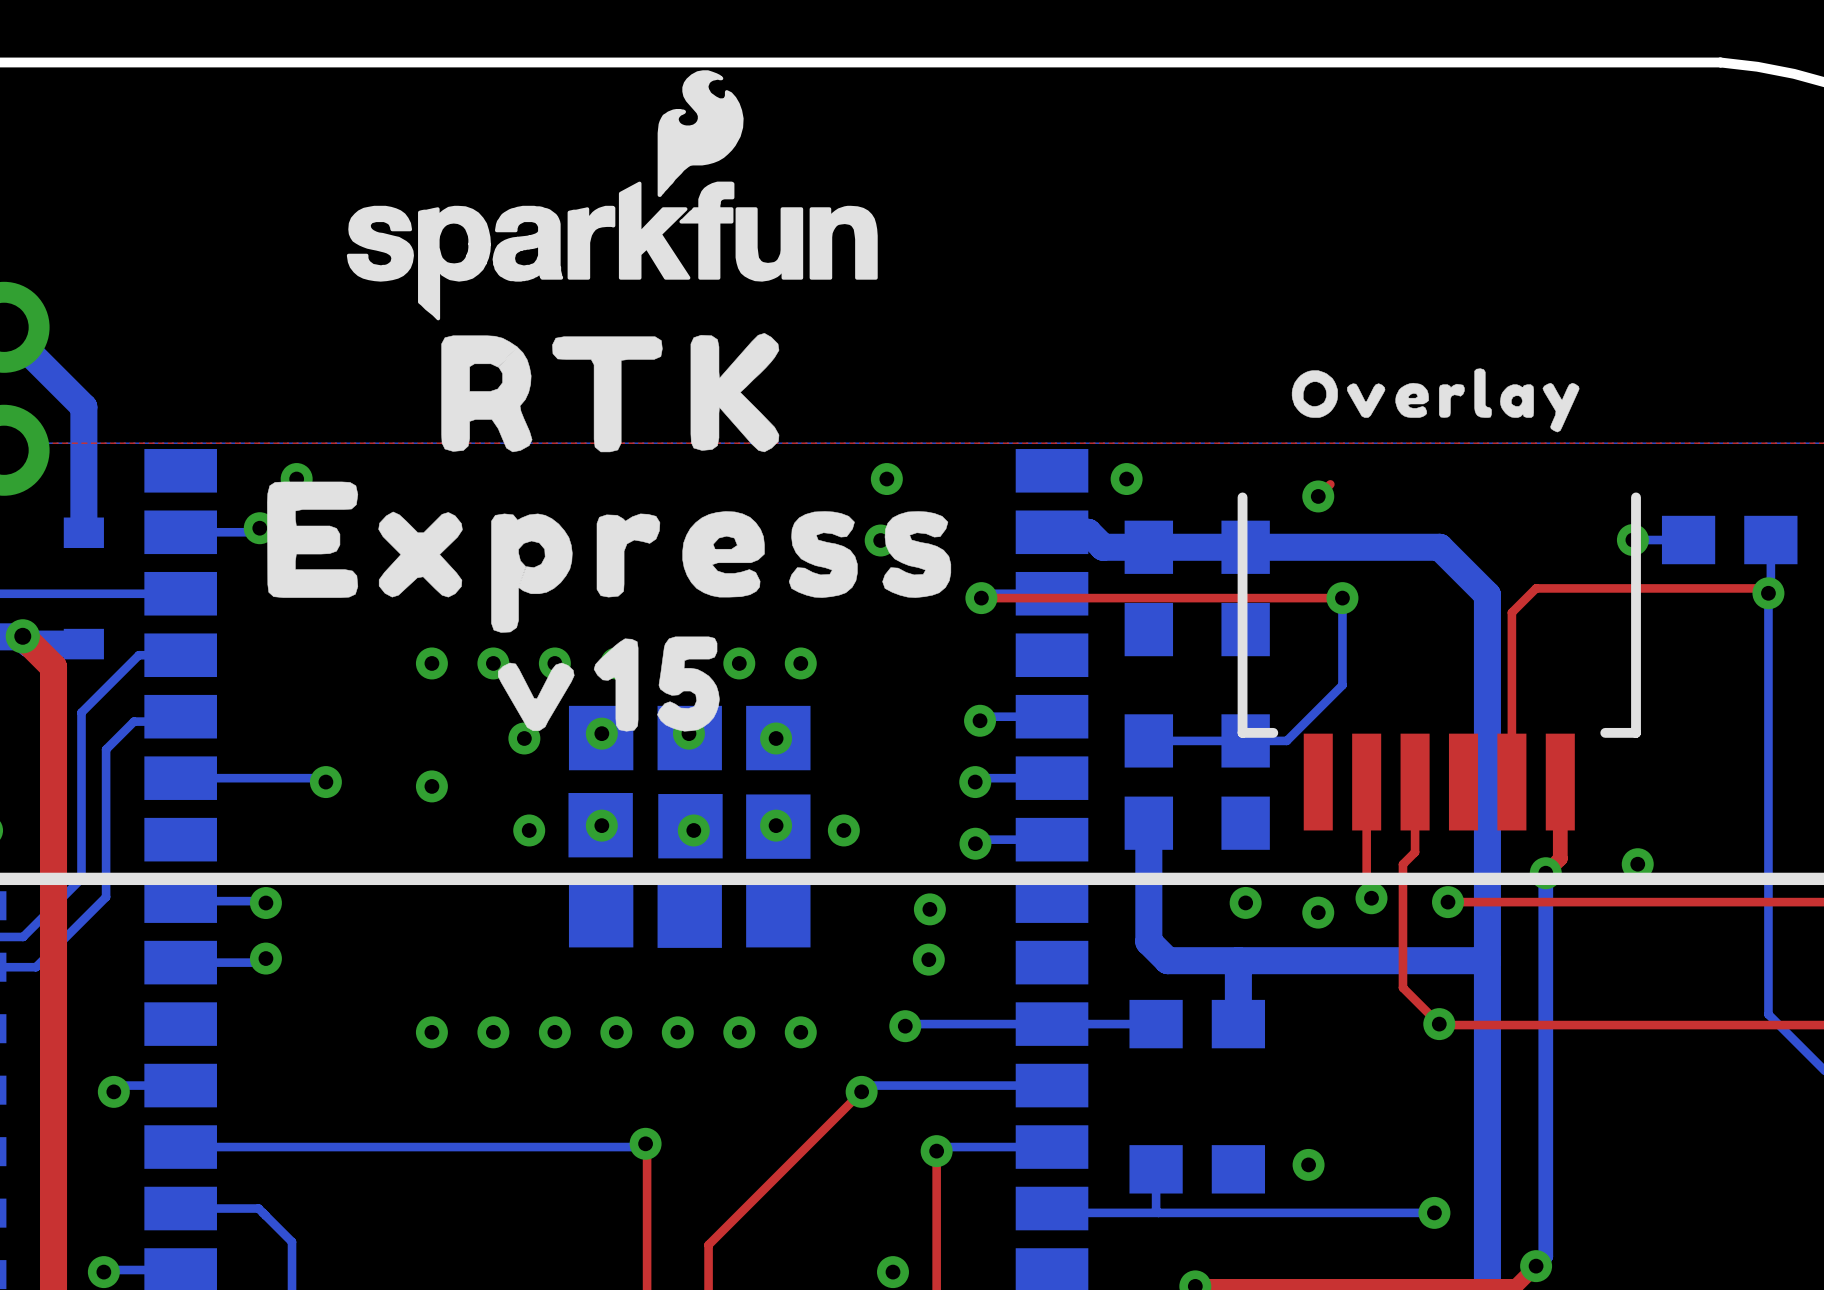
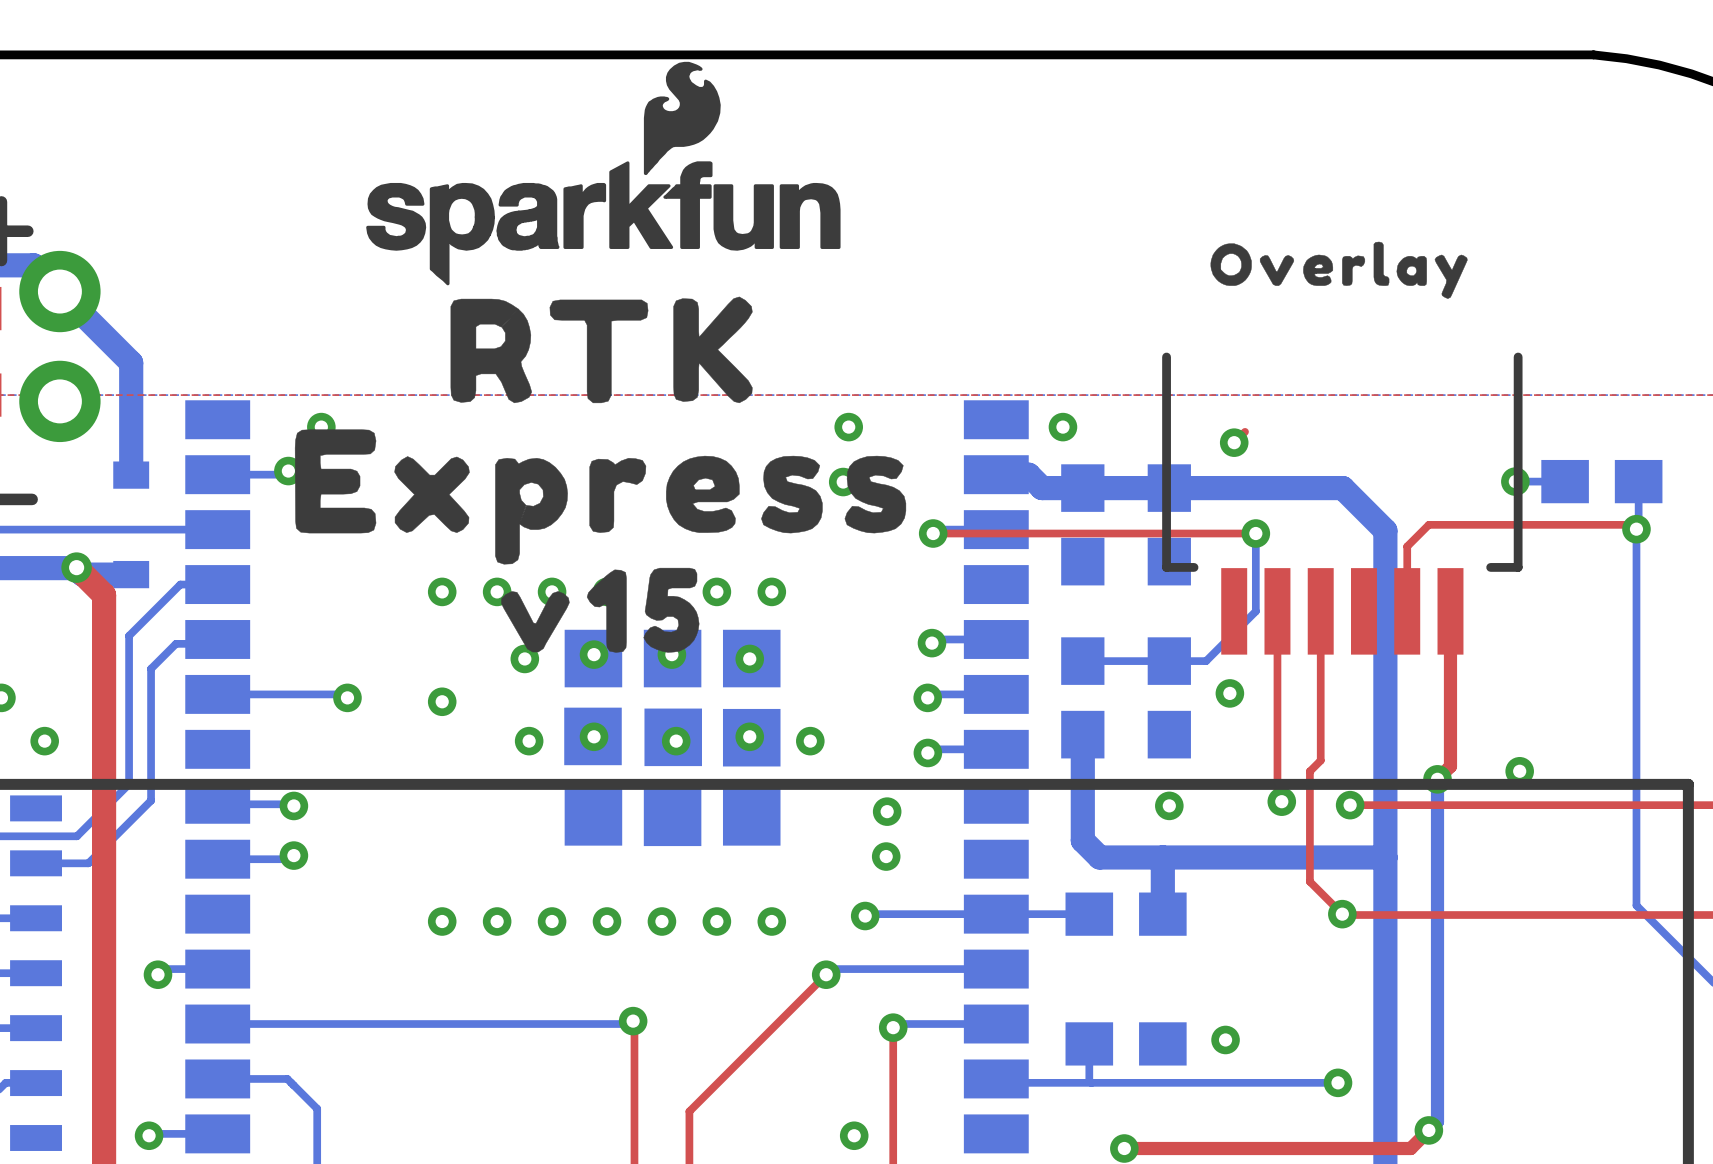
drawing position: (1435, 400) -> (1339, 270)
part position: (1439, 661) -> (1342, 503)
top track: none -> (1277, 611) (1277, 697)
top track: none -> (1320, 611) (1320, 697)
top track: (1511, 685) (1511, 782) -> (1450, 611) (1450, 697)
via position: (1318, 912) -> (1229, 693)

